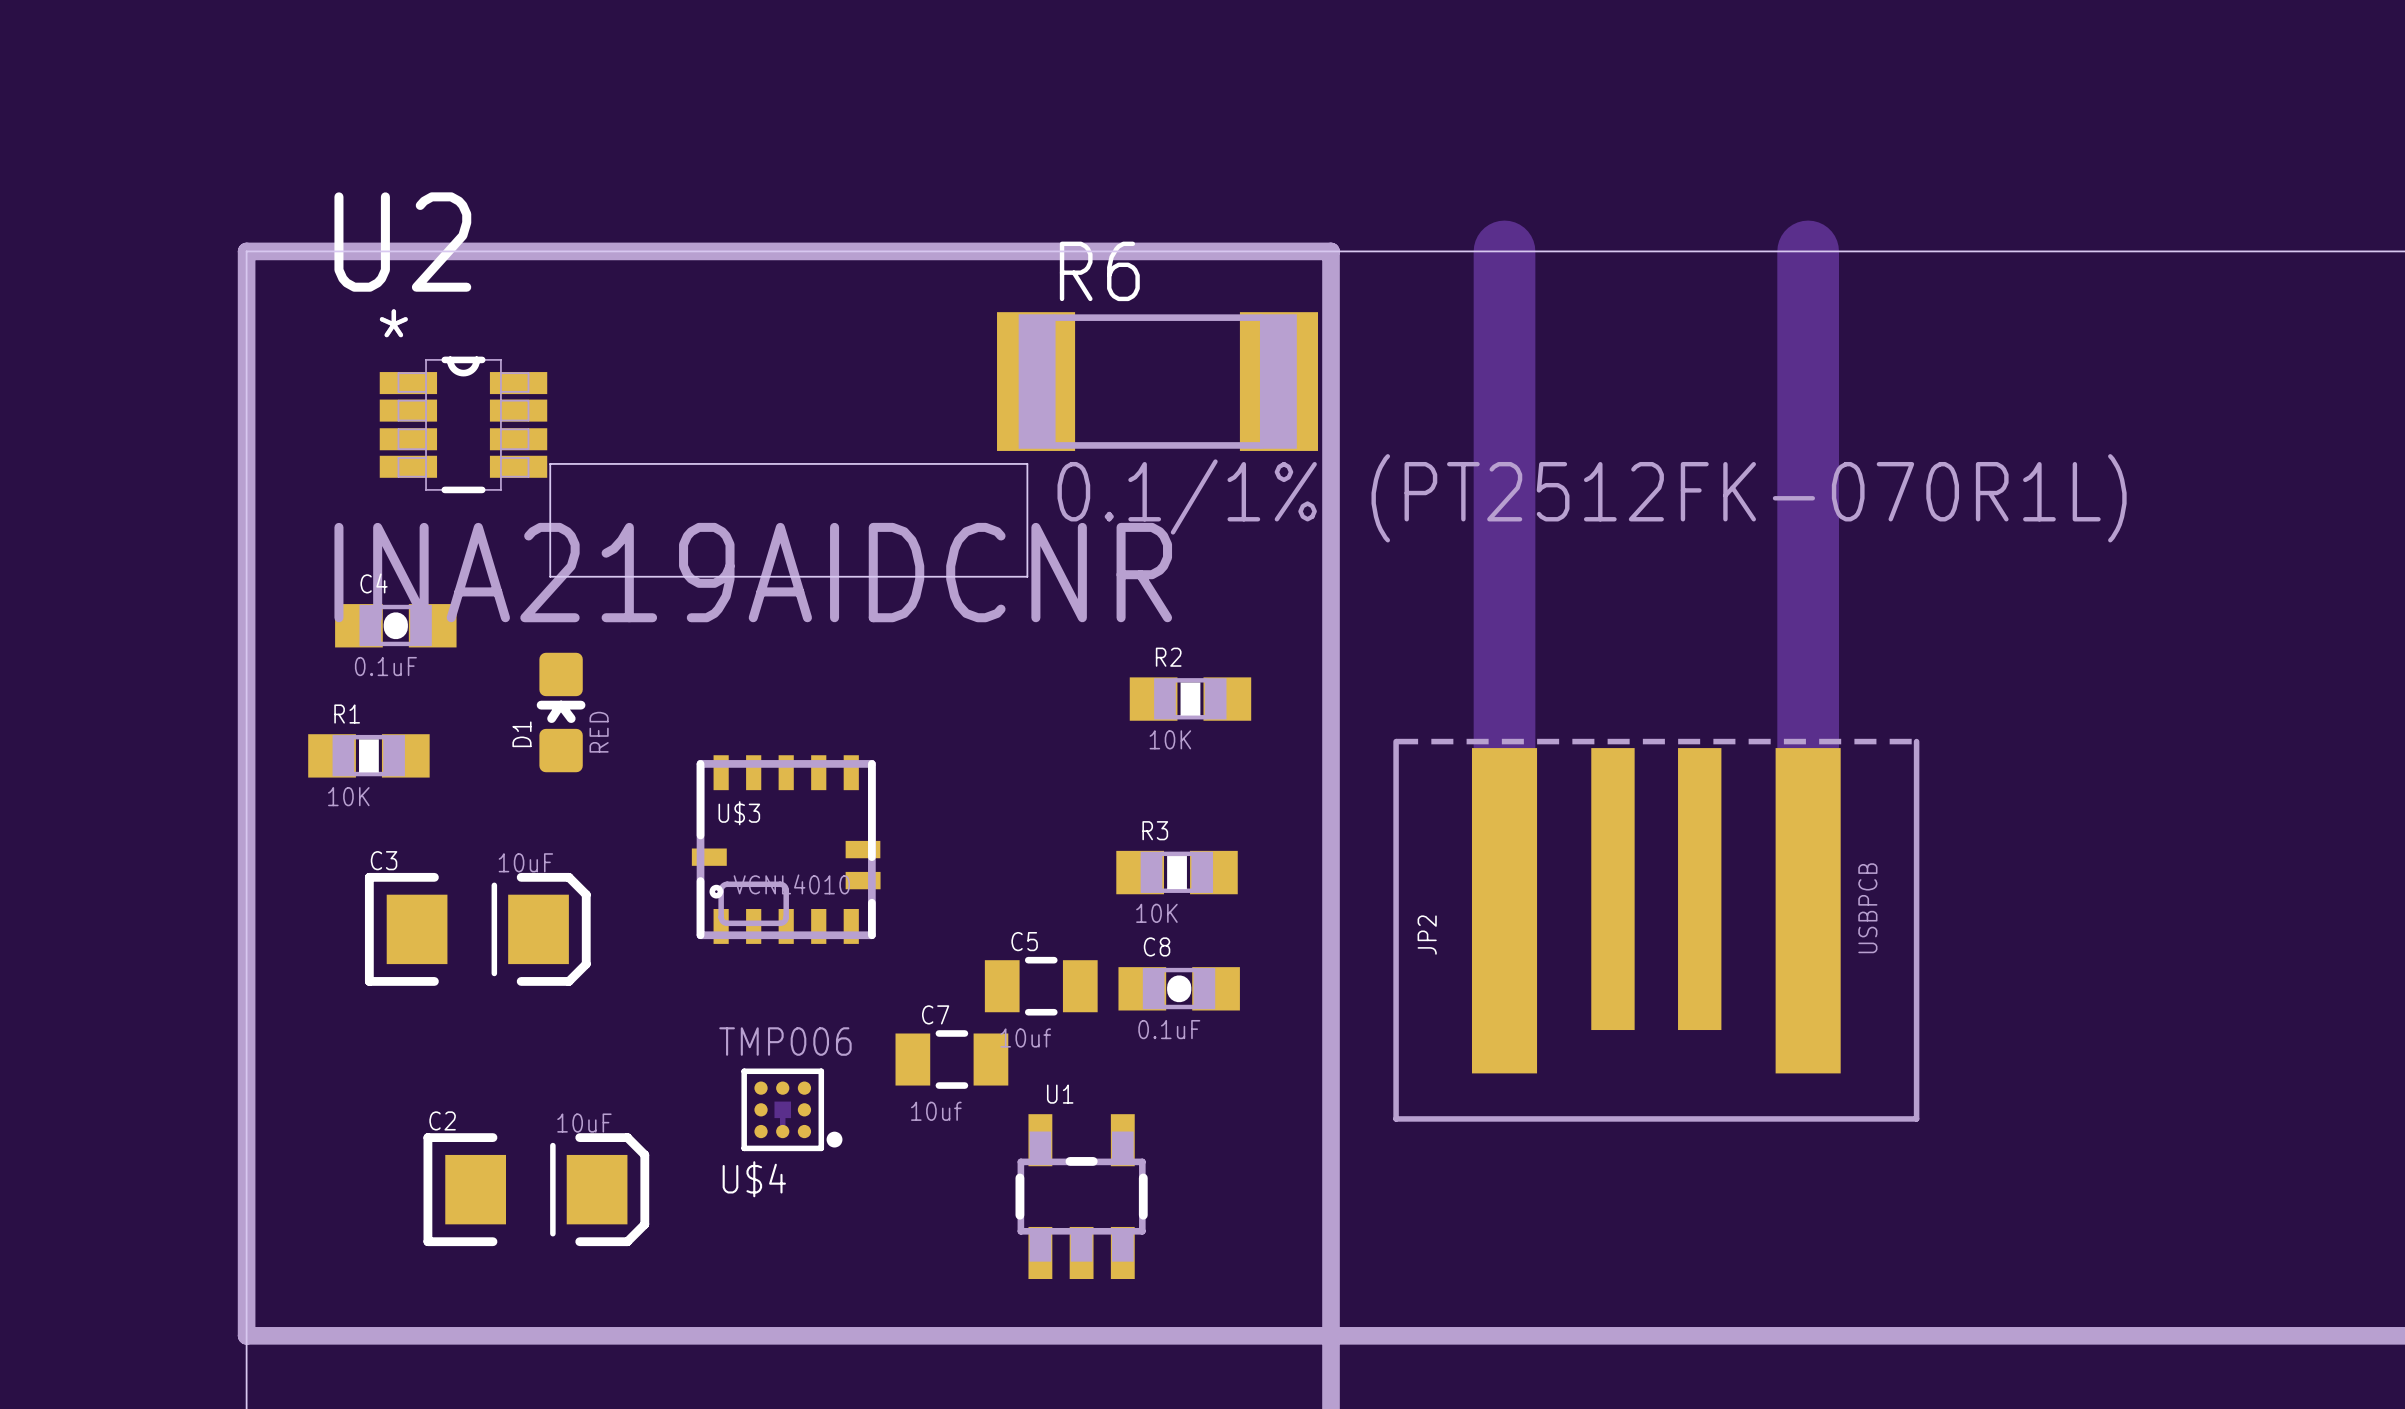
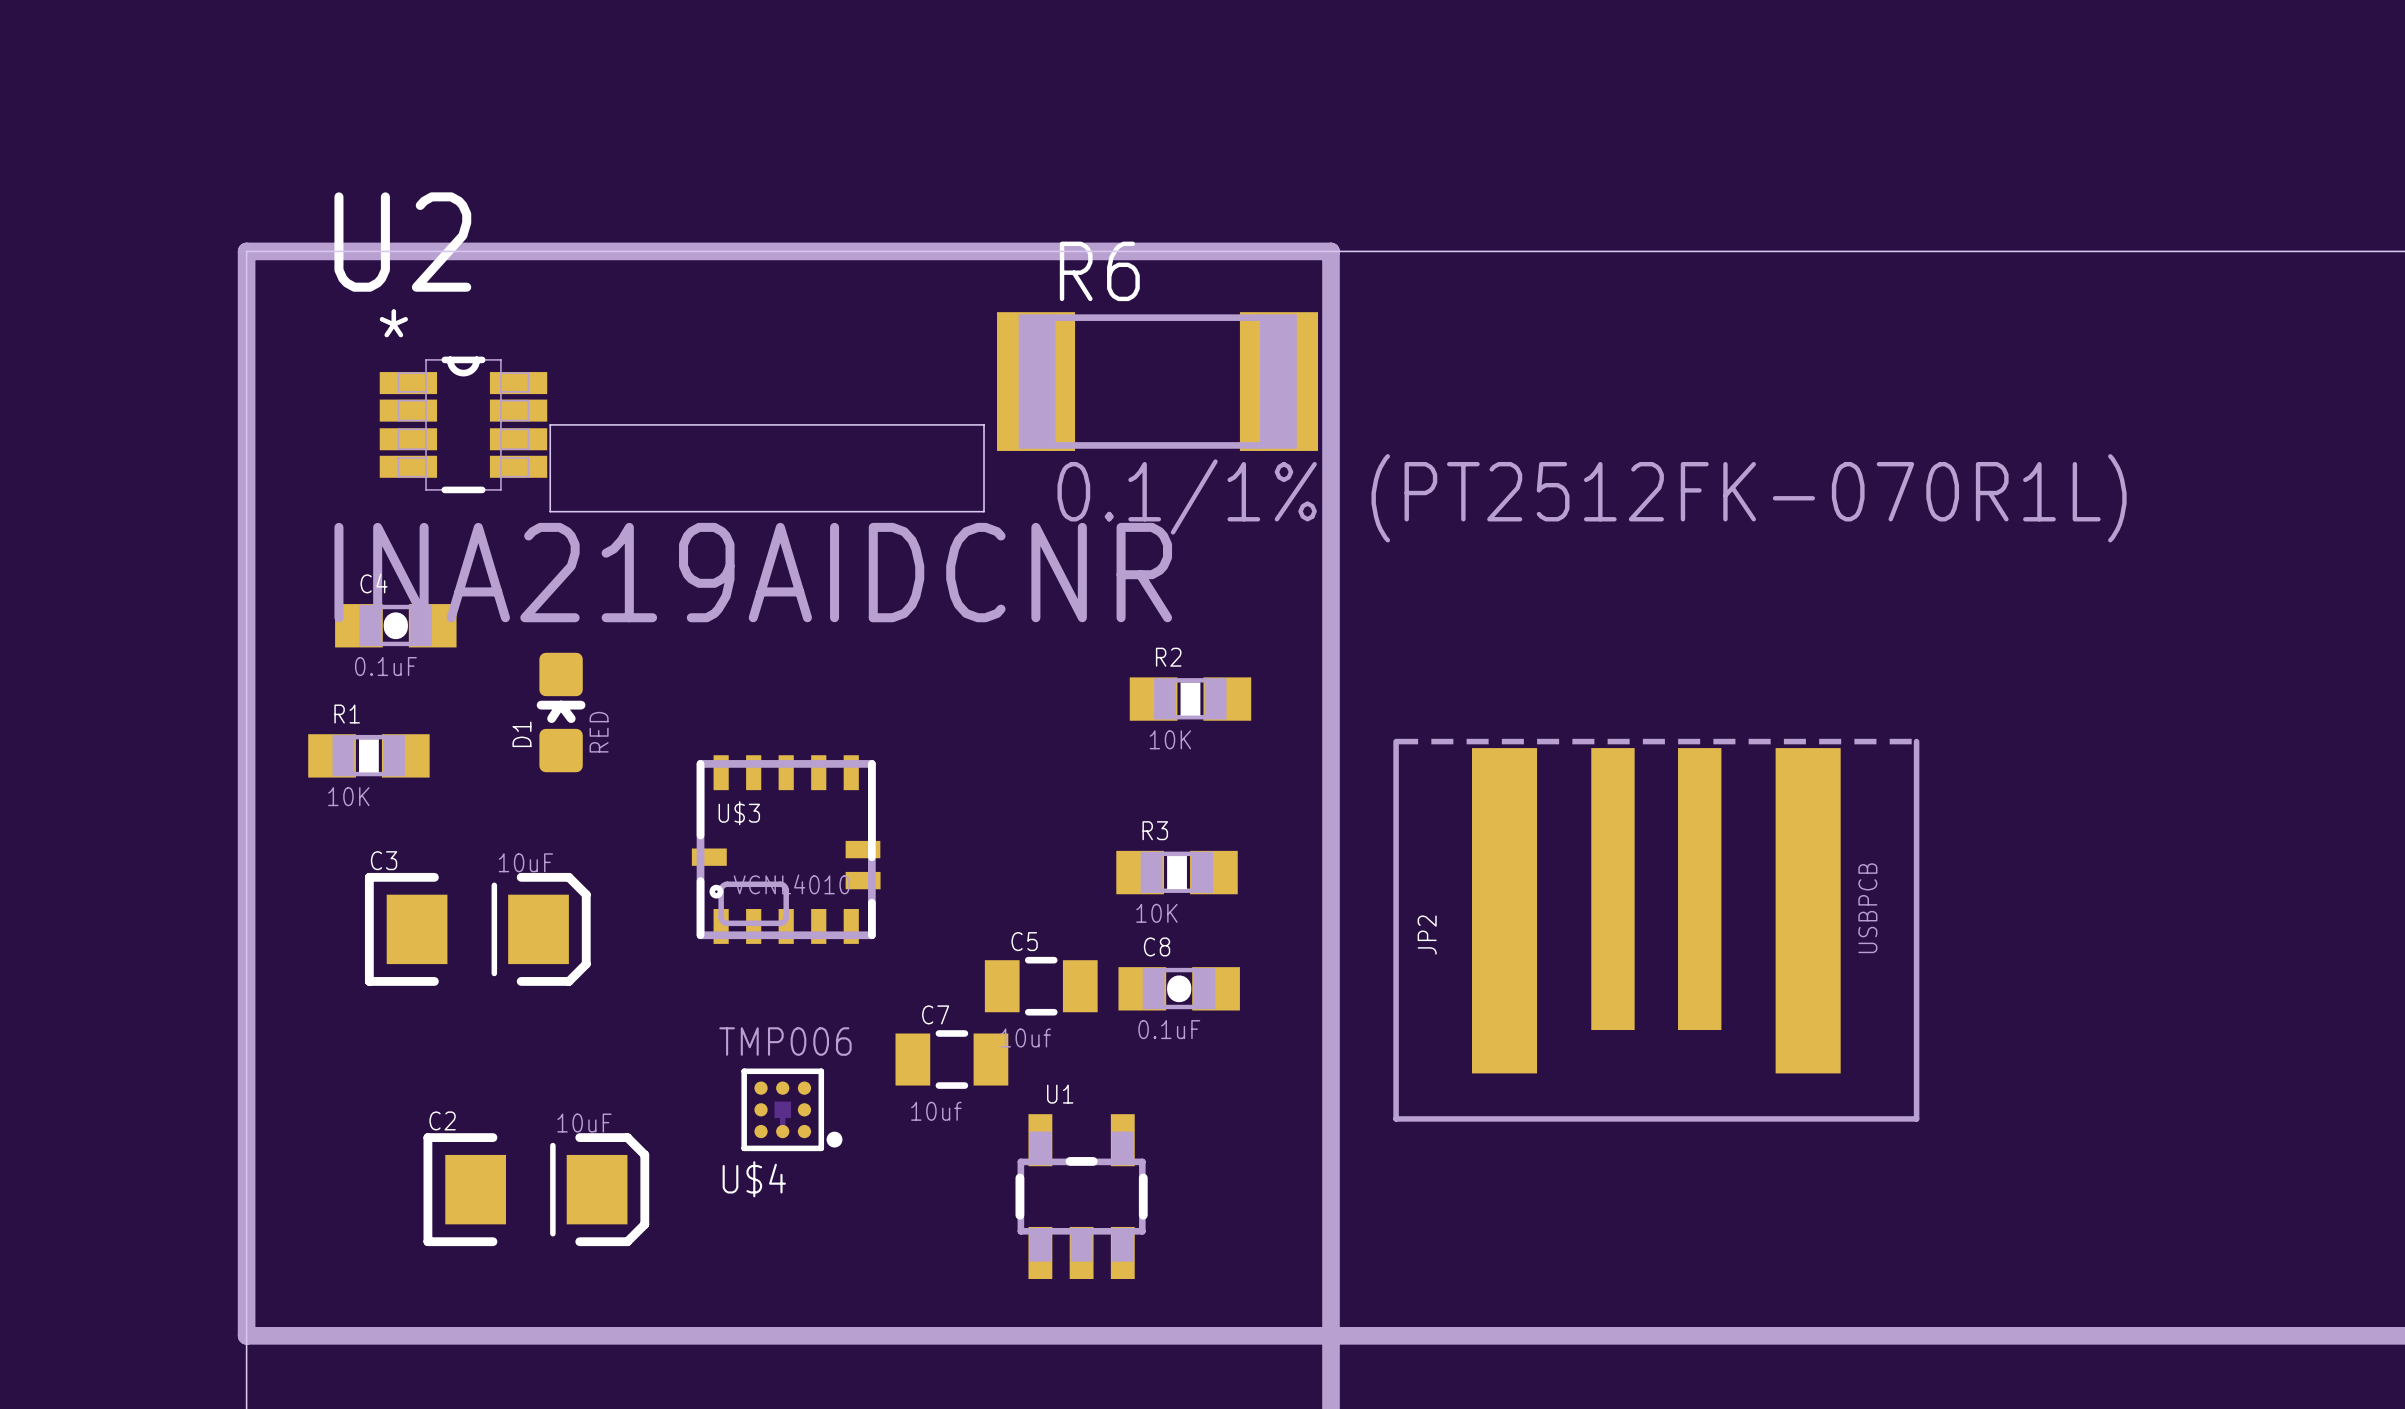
track: (1504, 251) (1504, 910) -> none
track: (1808, 251) (1808, 910) -> none
board edge: (550, 463) (1027, 463) (1027, 576) (550, 576) (550, 511) -> (550, 463) (550, 424) (984, 424) (984, 511) (550, 511)

